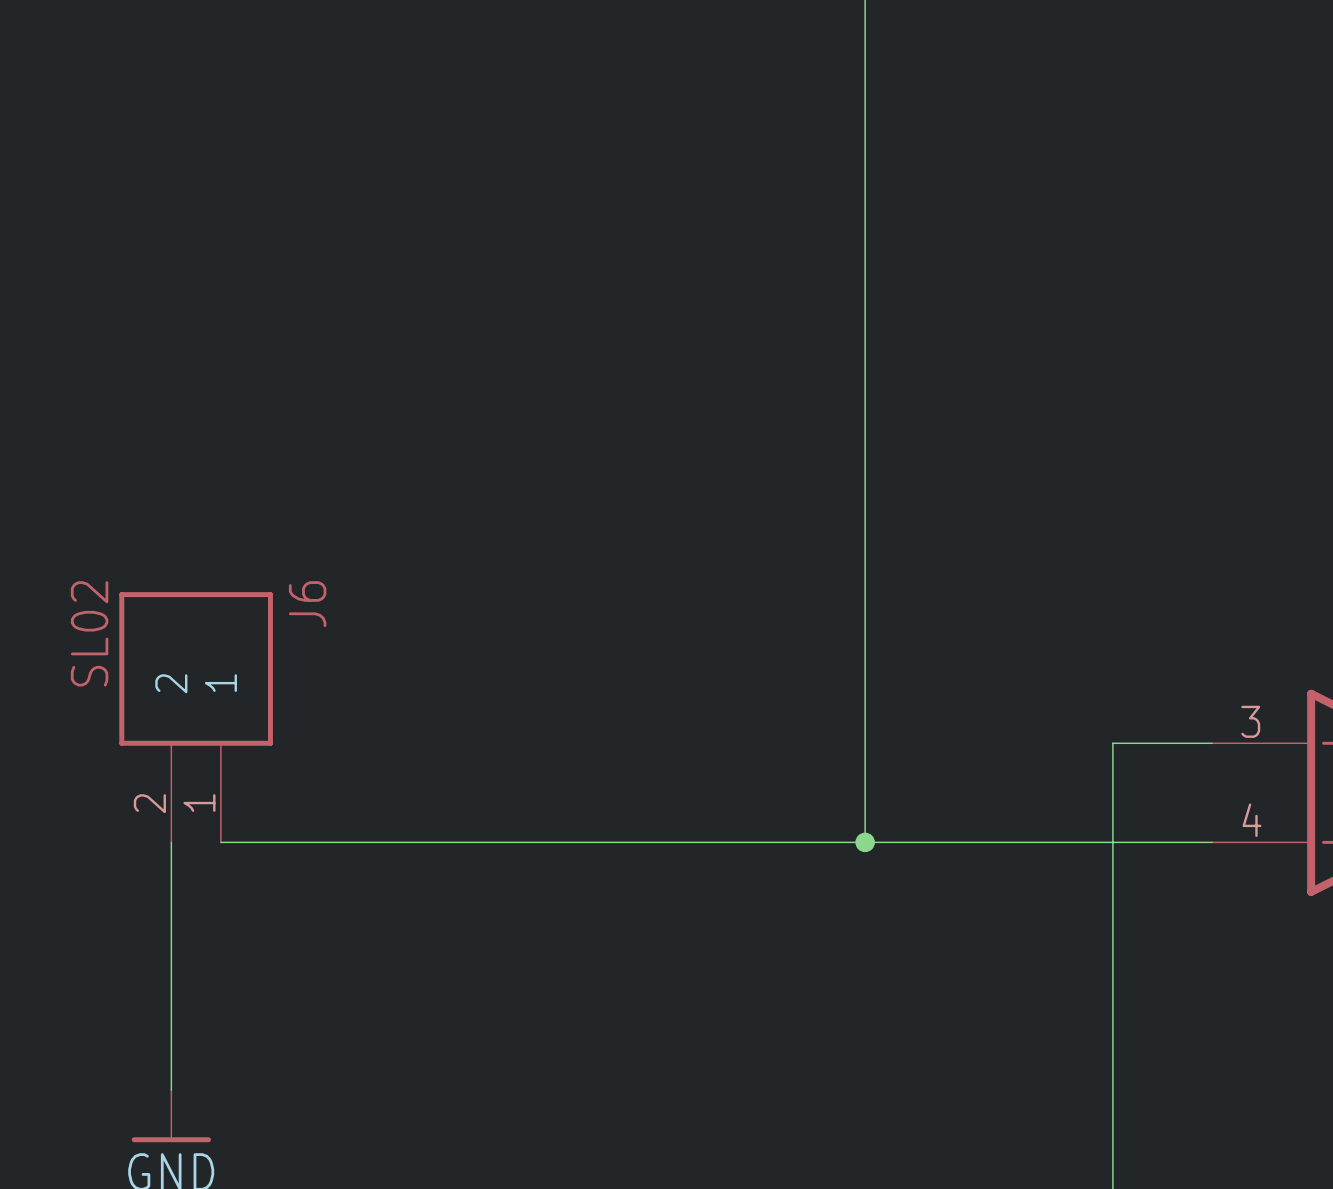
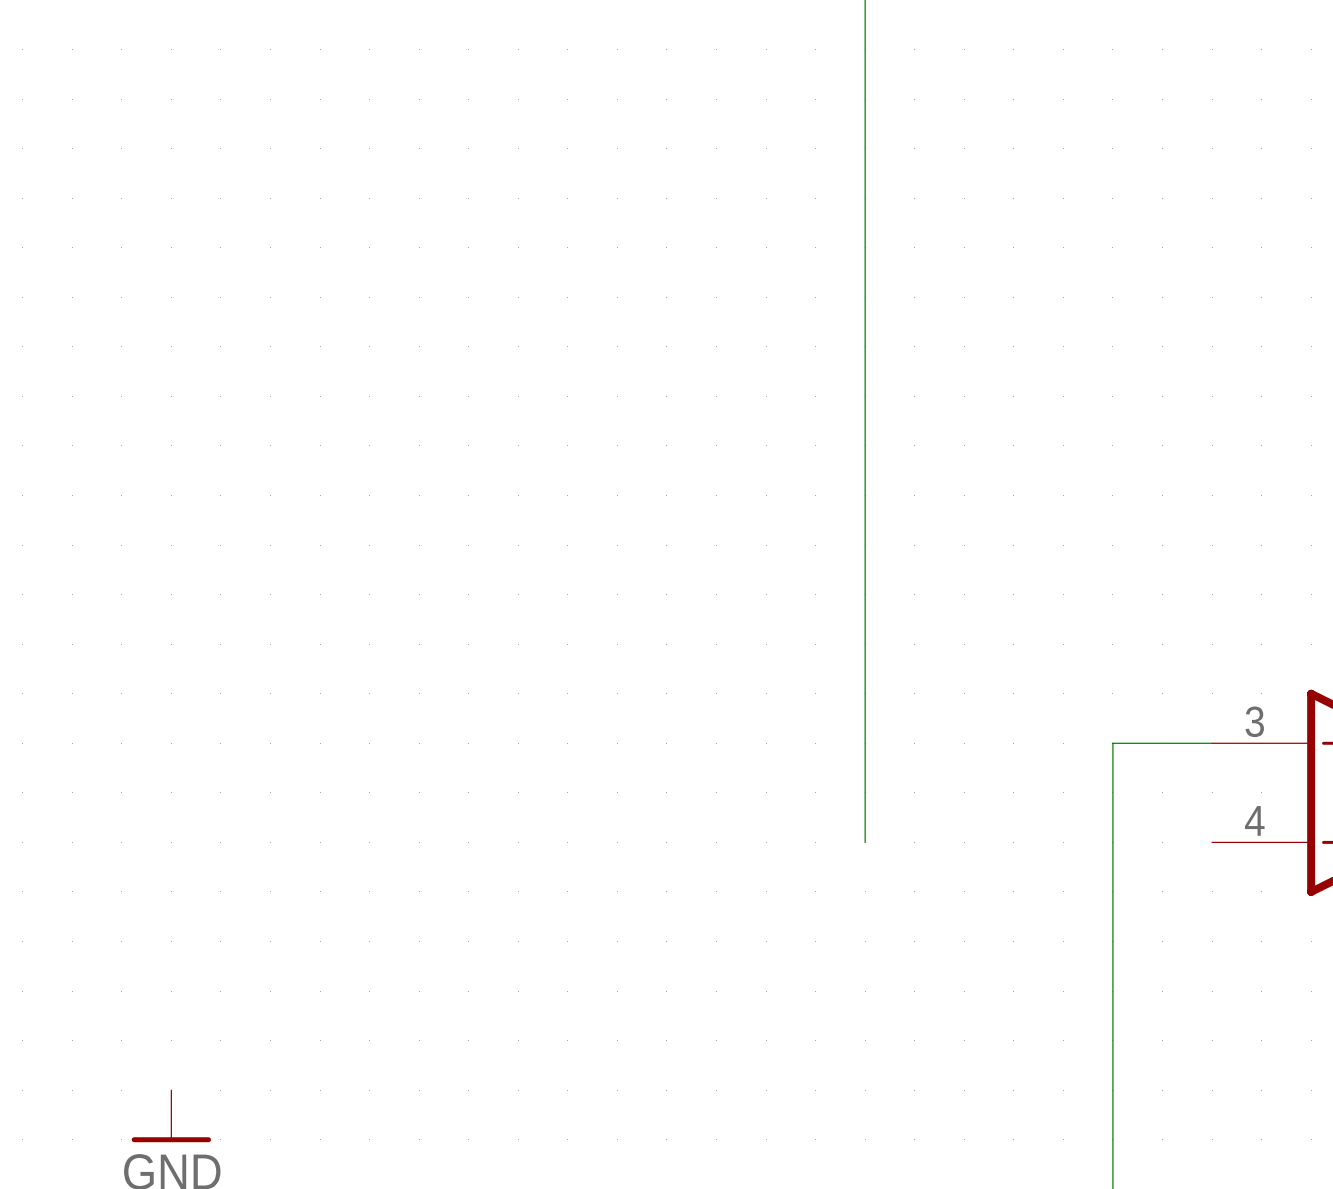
J6: SL02 (196, 717) -> none
wire: (171, 842) (171, 1090) -> none
wire: (220, 842) (1212, 842) -> none
junction: (865, 842) -> none

